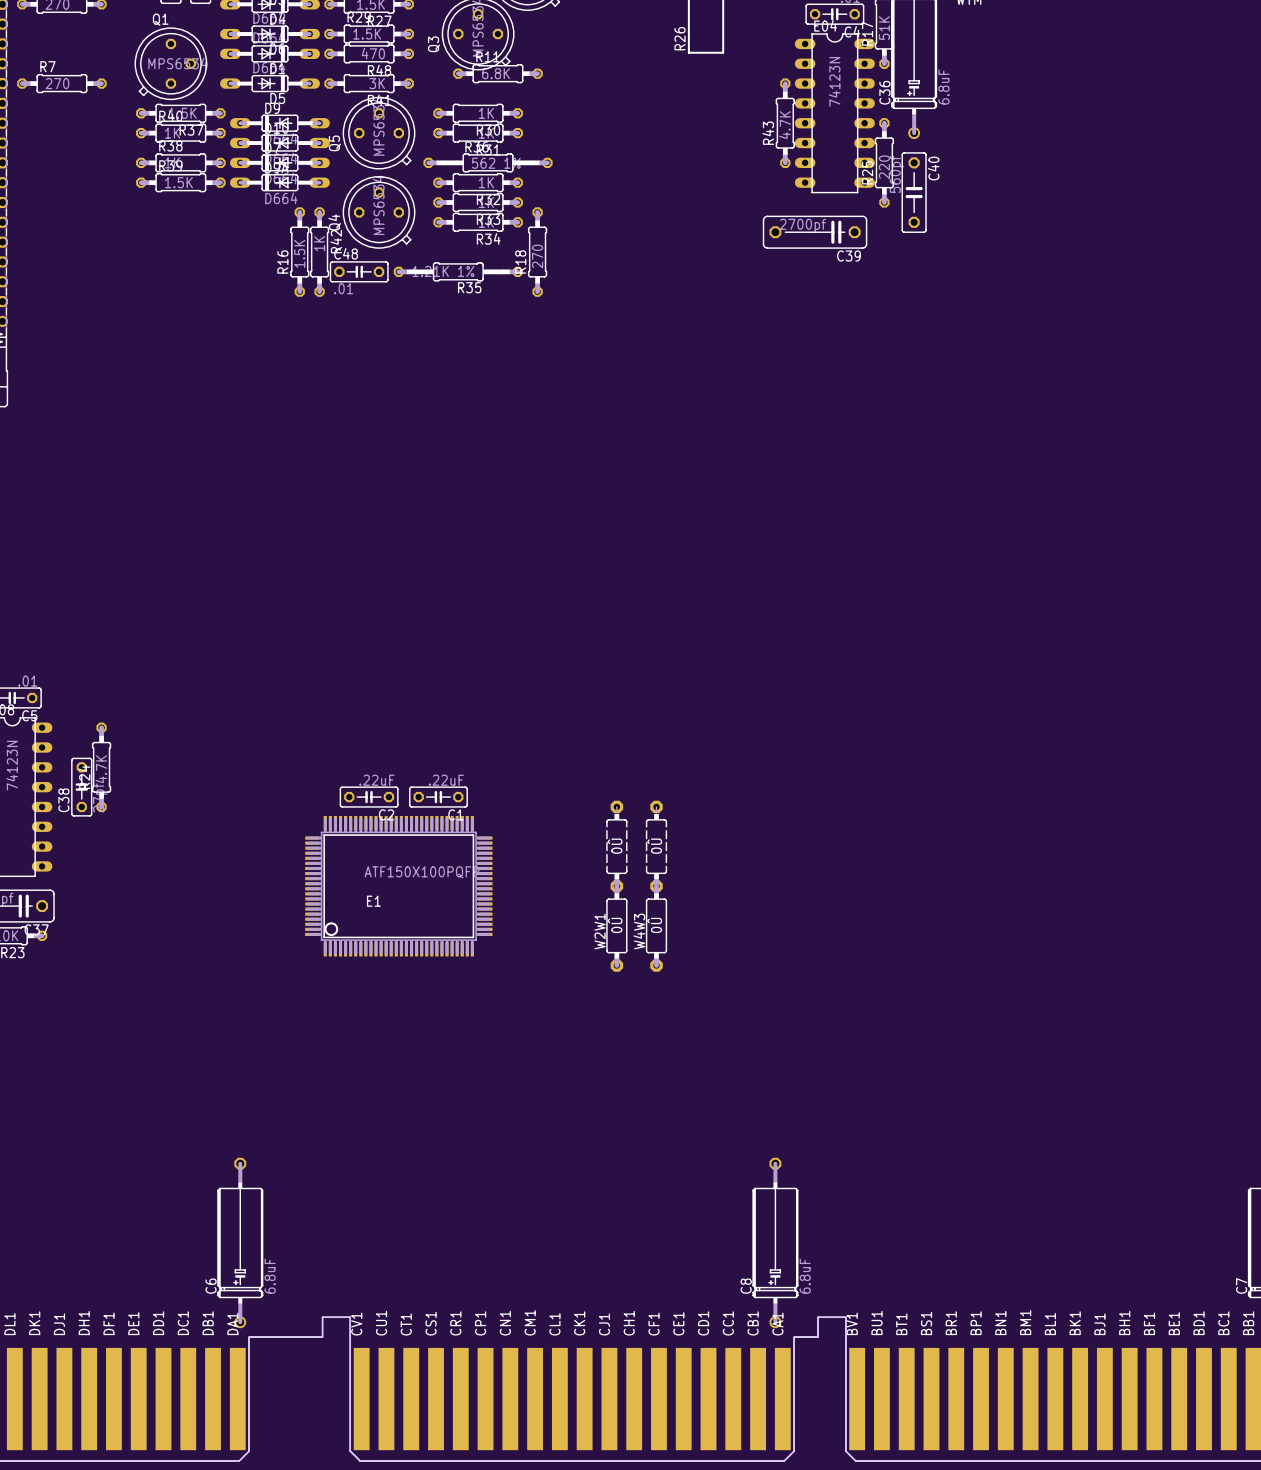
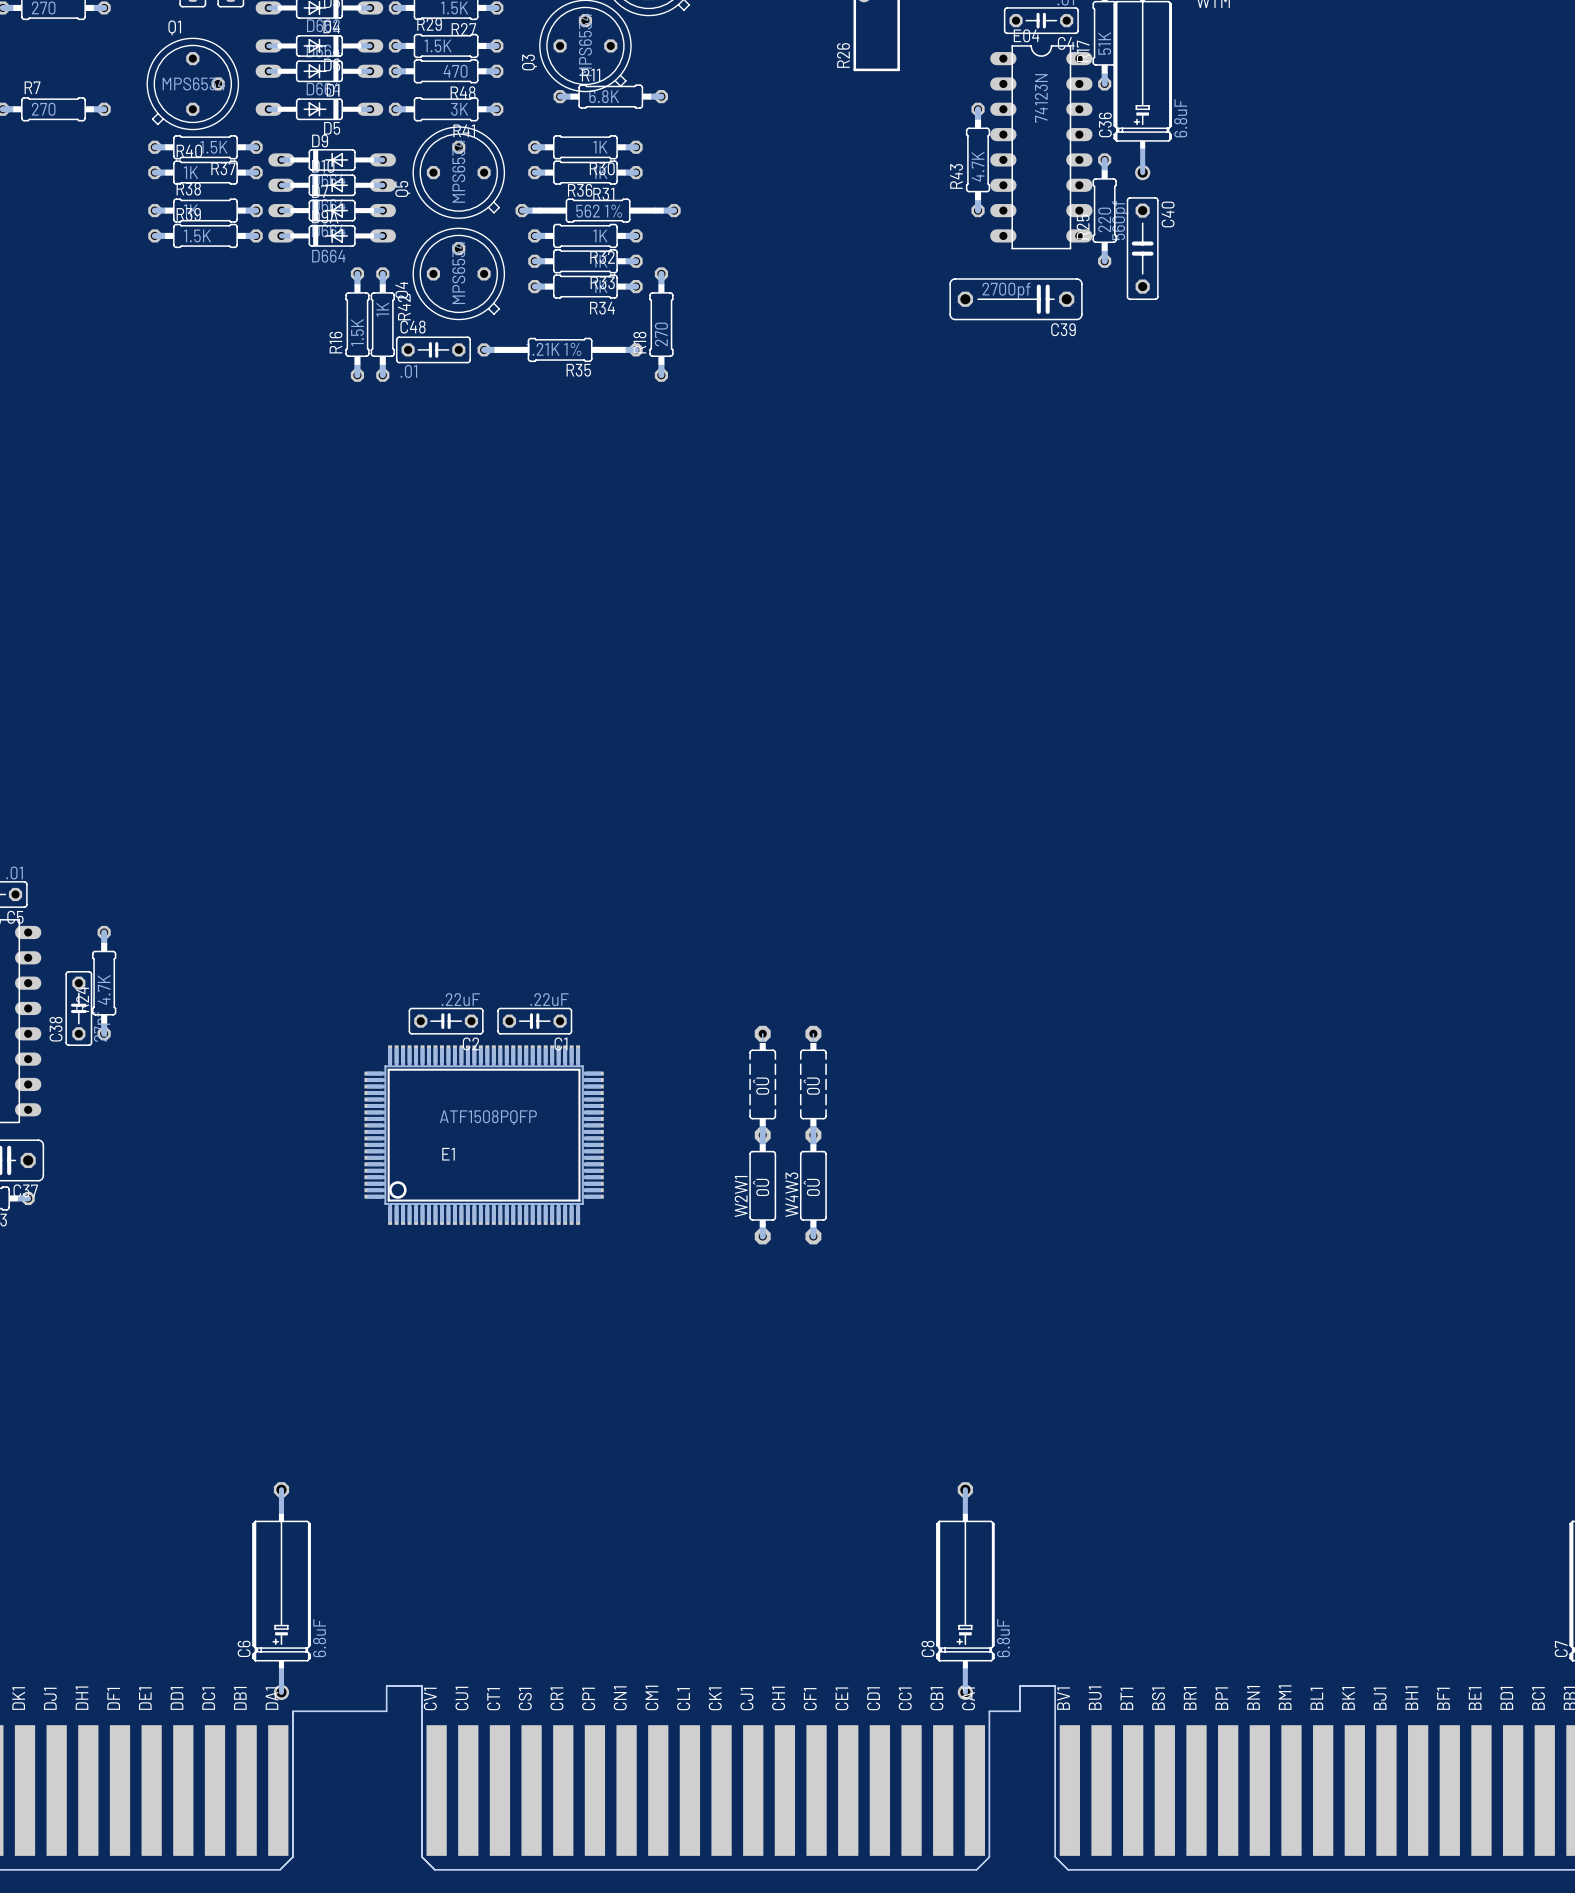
E1 value: ATF150X100PQFP (422, 872) -> ATF1508PQFP (488, 1117)

